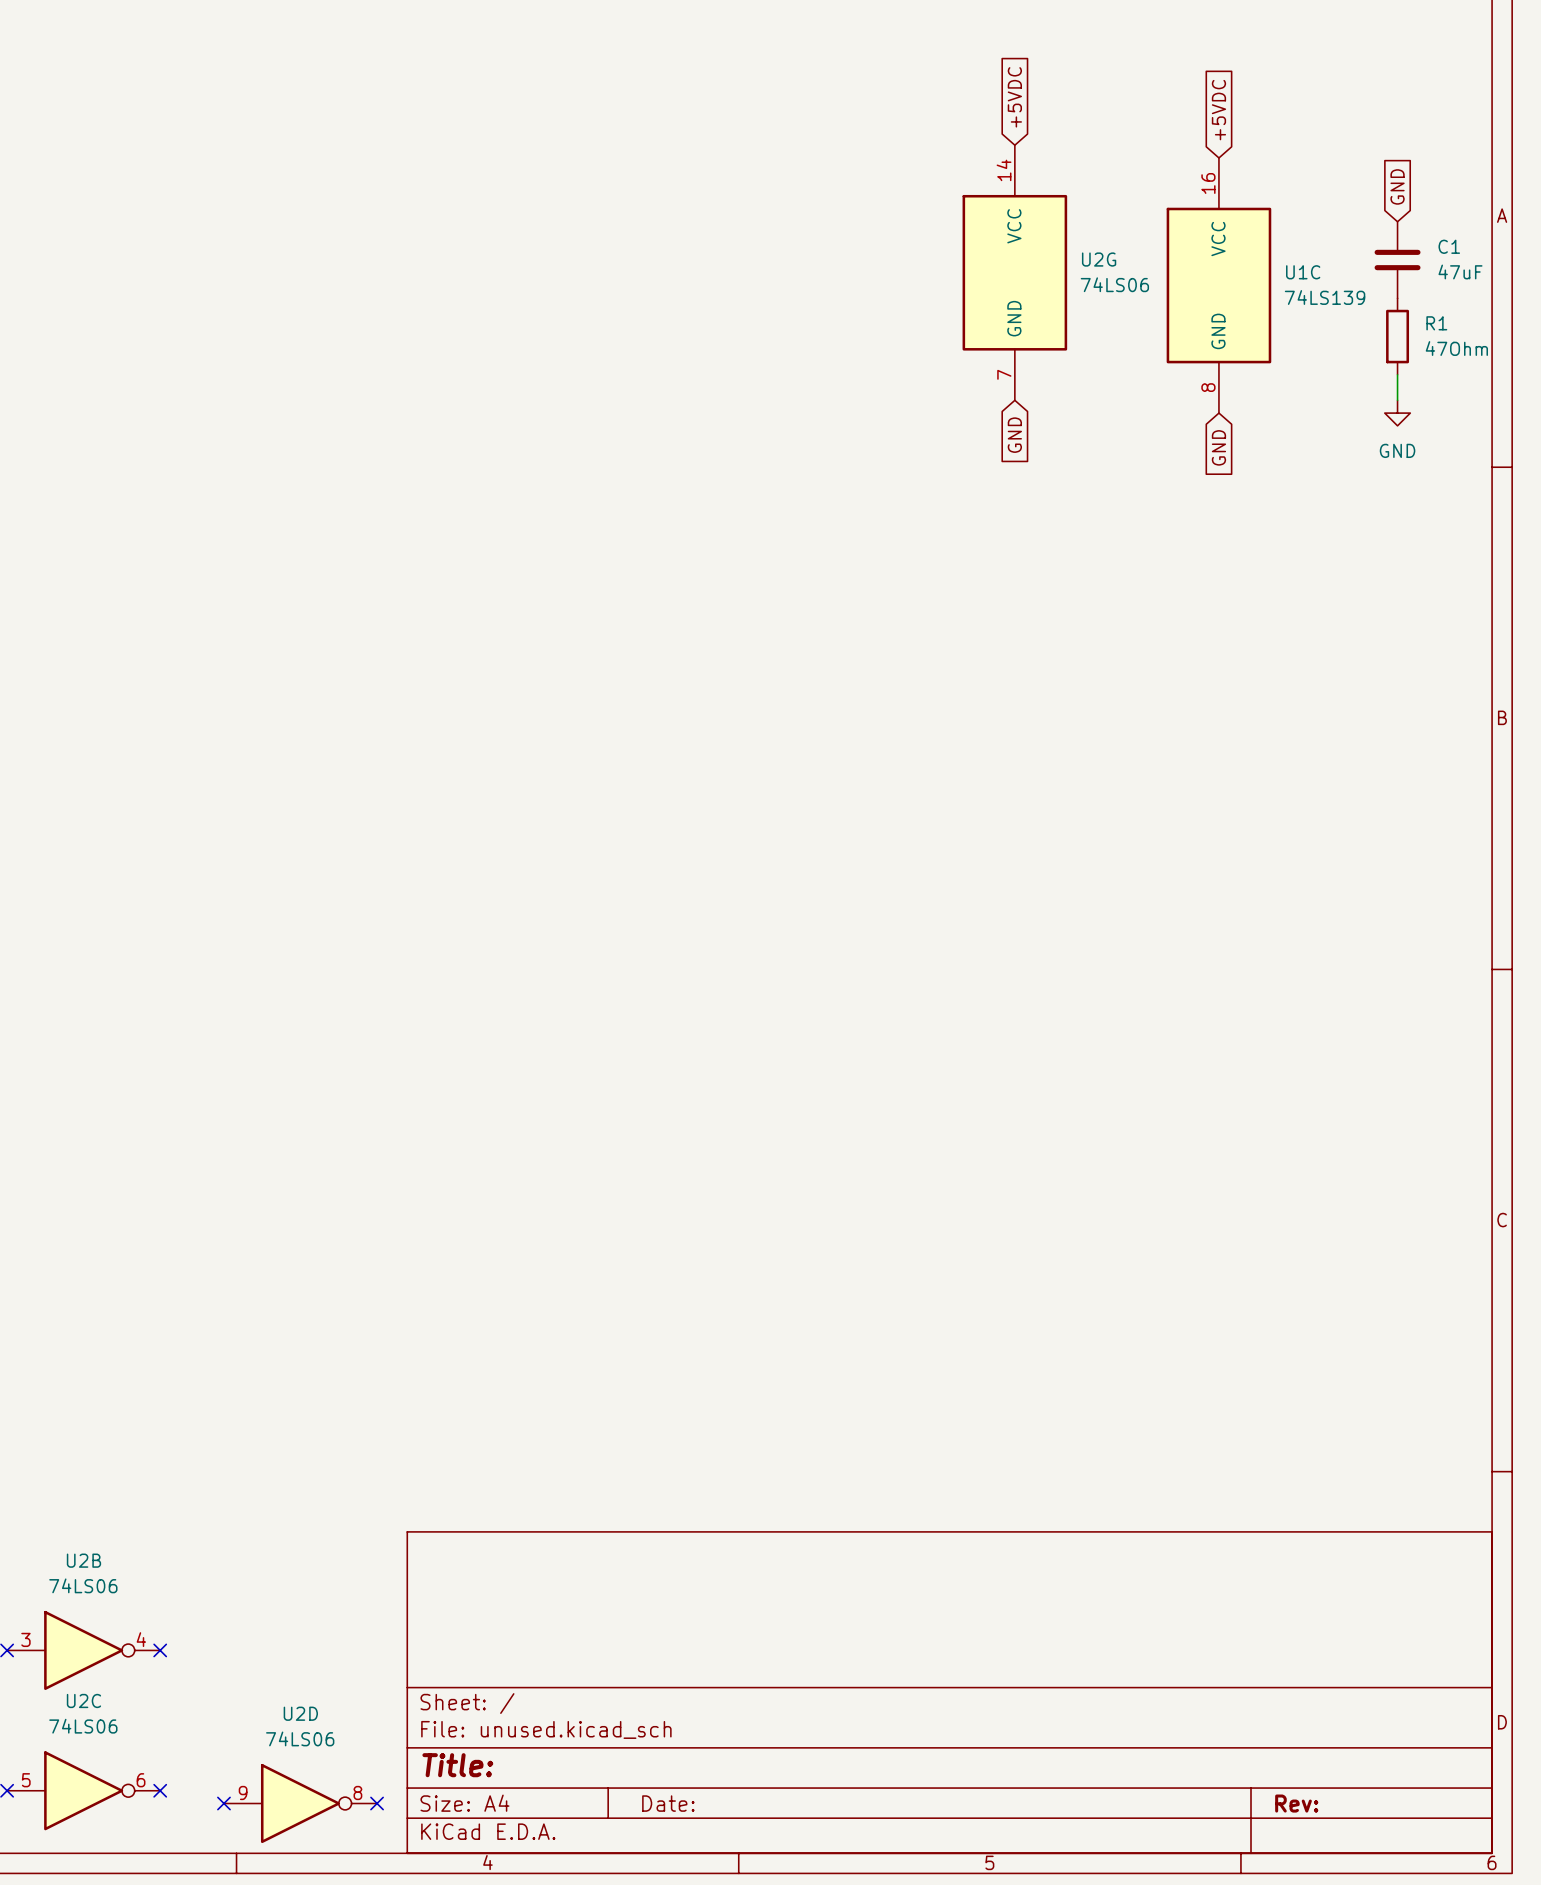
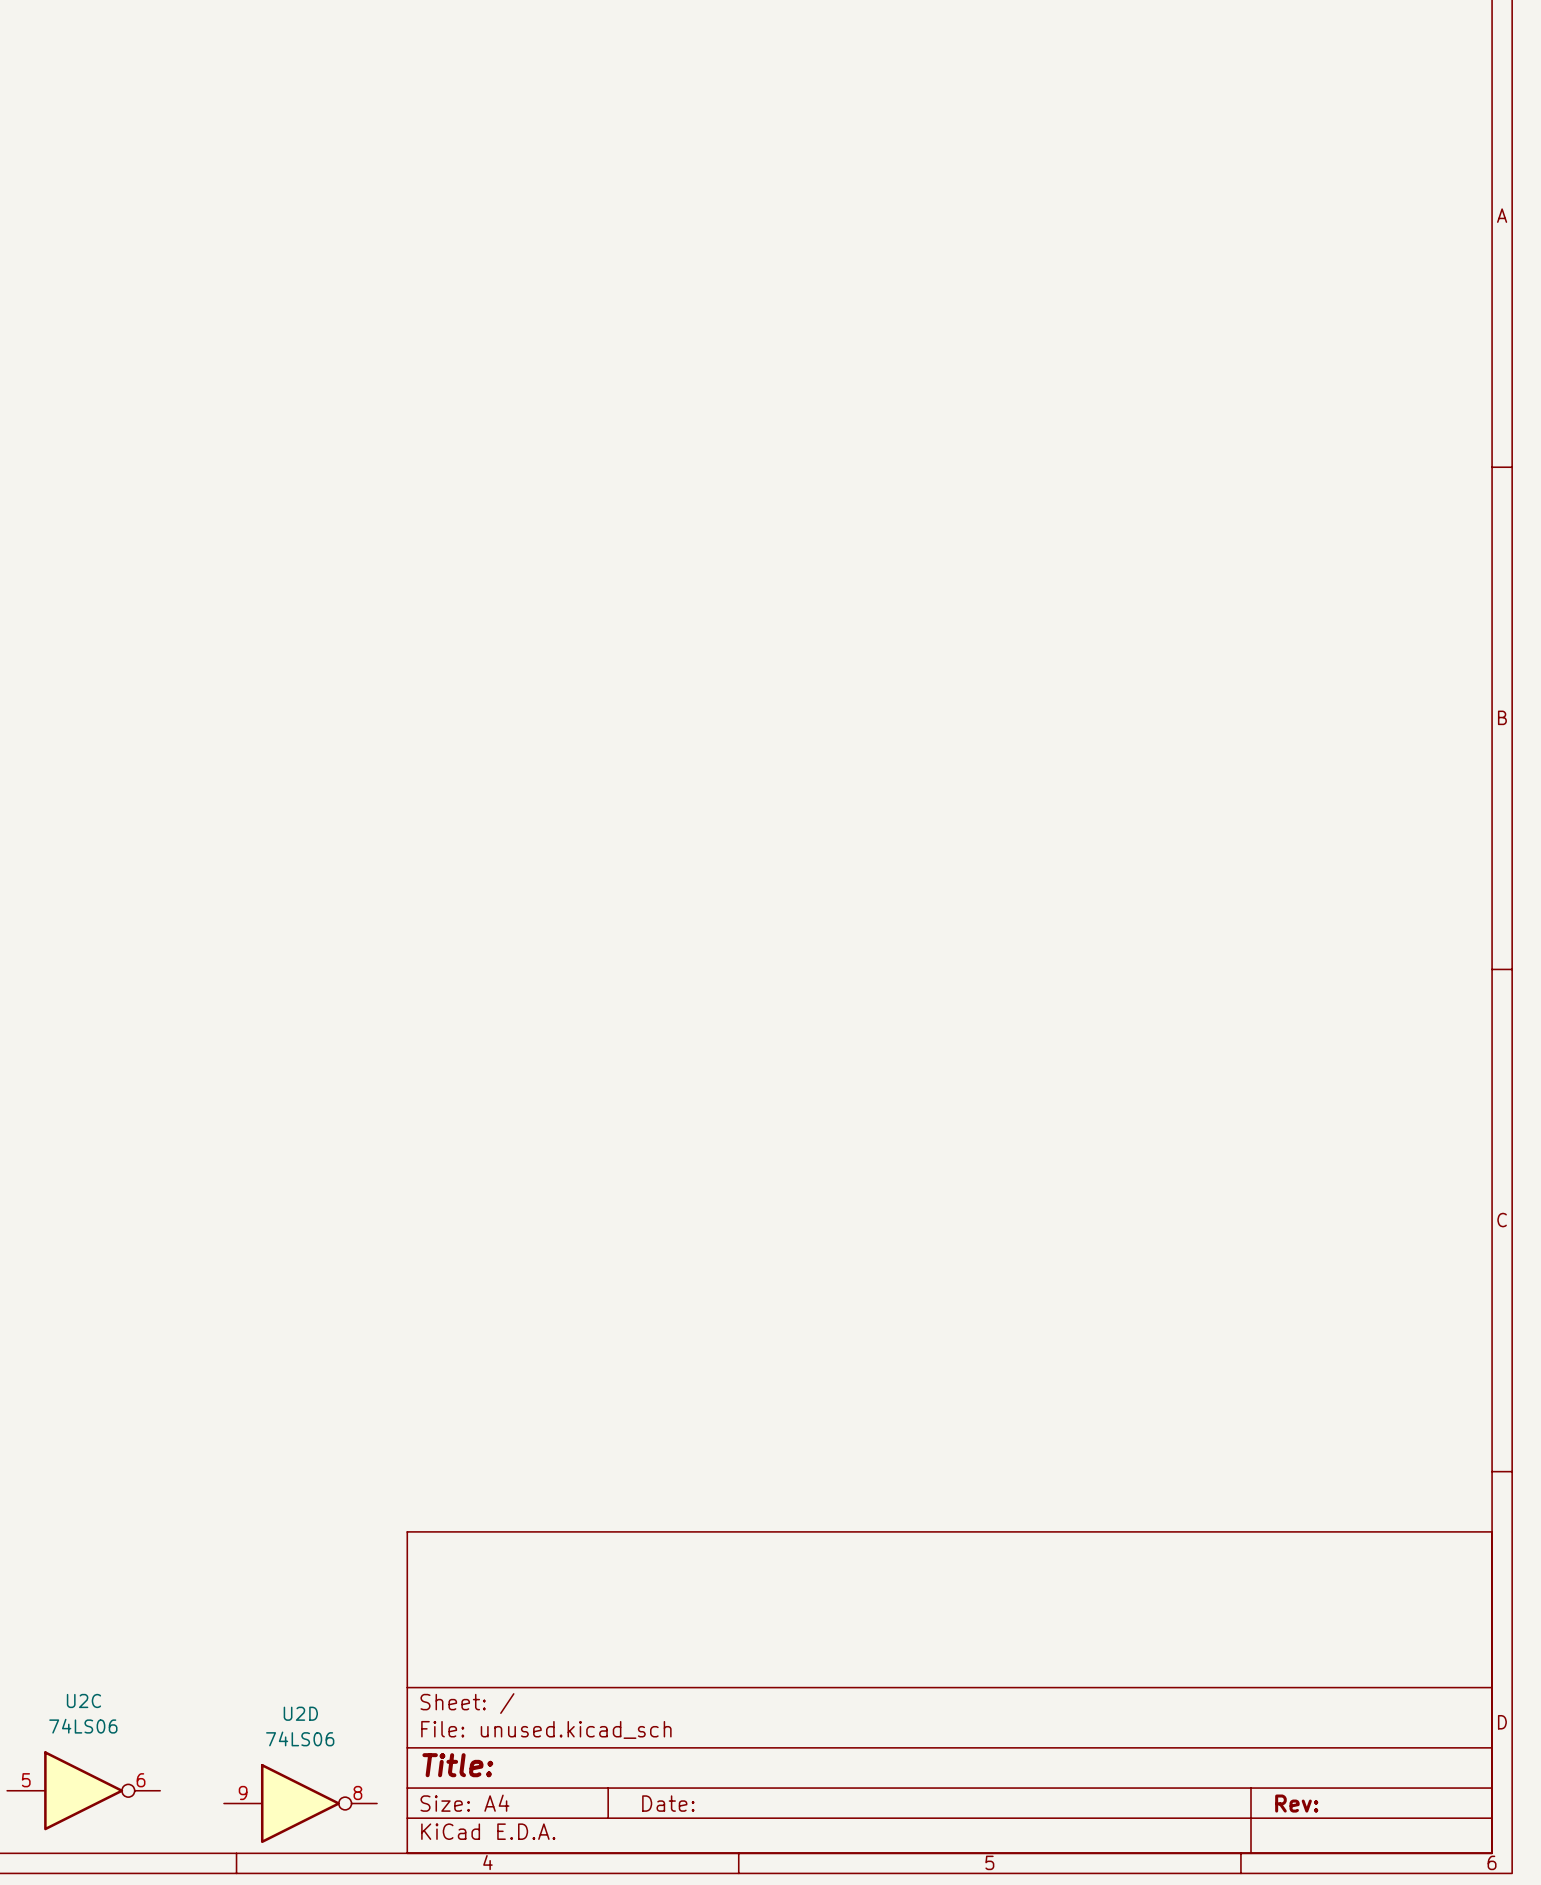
global label: +5VDC (1014, 97) -> none
global label: +5VDC (1218, 110) -> none
global label: GND (1397, 186) -> none
C1: 47uF (1397, 260) -> none
U2G: 74LS06 (1014, 272) -> none
U1C: 74LS139 (1218, 285) -> none
R1: 47Ohm (1397, 336) -> none
wire: (1397, 374) (1397, 400) -> none
power symbol: GND (1397, 413) -> none
global label: GND (1014, 435) -> none
global label: GND (1218, 447) -> none
no-connect mark: (7, 1650) -> none
U2B: 74LS06 (83, 1650) -> none
no-connect mark: (160, 1650) -> none
no-connect mark: (7, 1790) -> none
no-connect mark: (160, 1790) -> none
no-connect mark: (223, 1803) -> none
no-connect mark: (377, 1803) -> none

